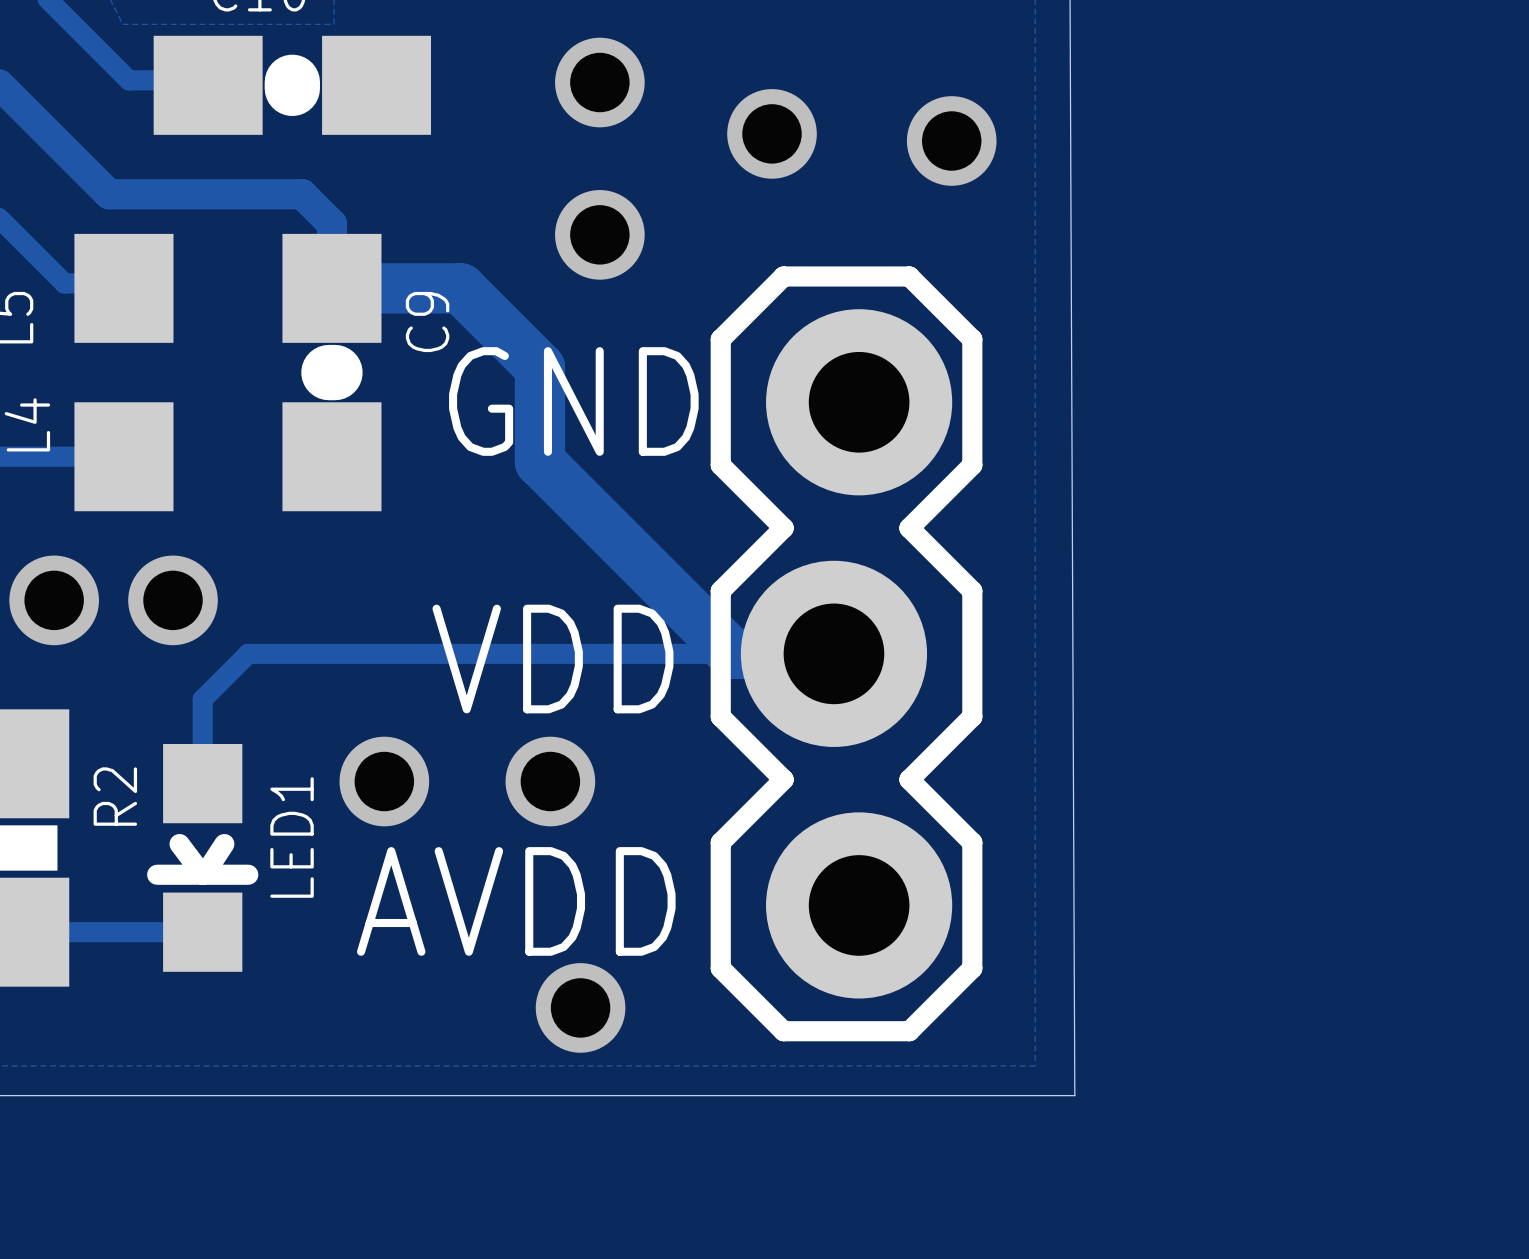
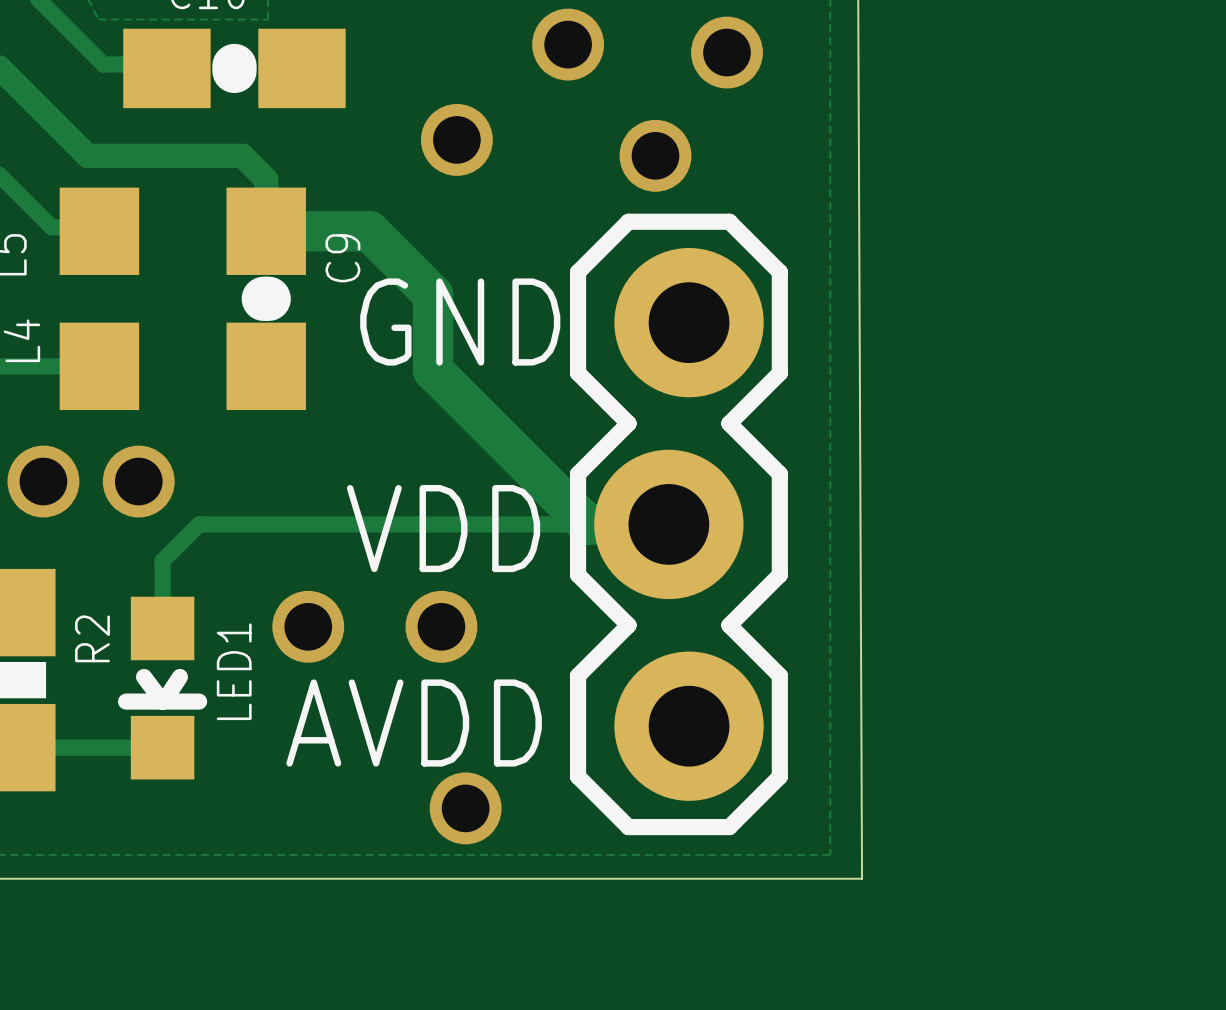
via: none -> (568, 44)
via: (599, 82) -> none
via: (772, 133) -> none
via position: (951, 140) -> (727, 52)
via: none -> (655, 155)
via position: (599, 234) -> (456, 139)

